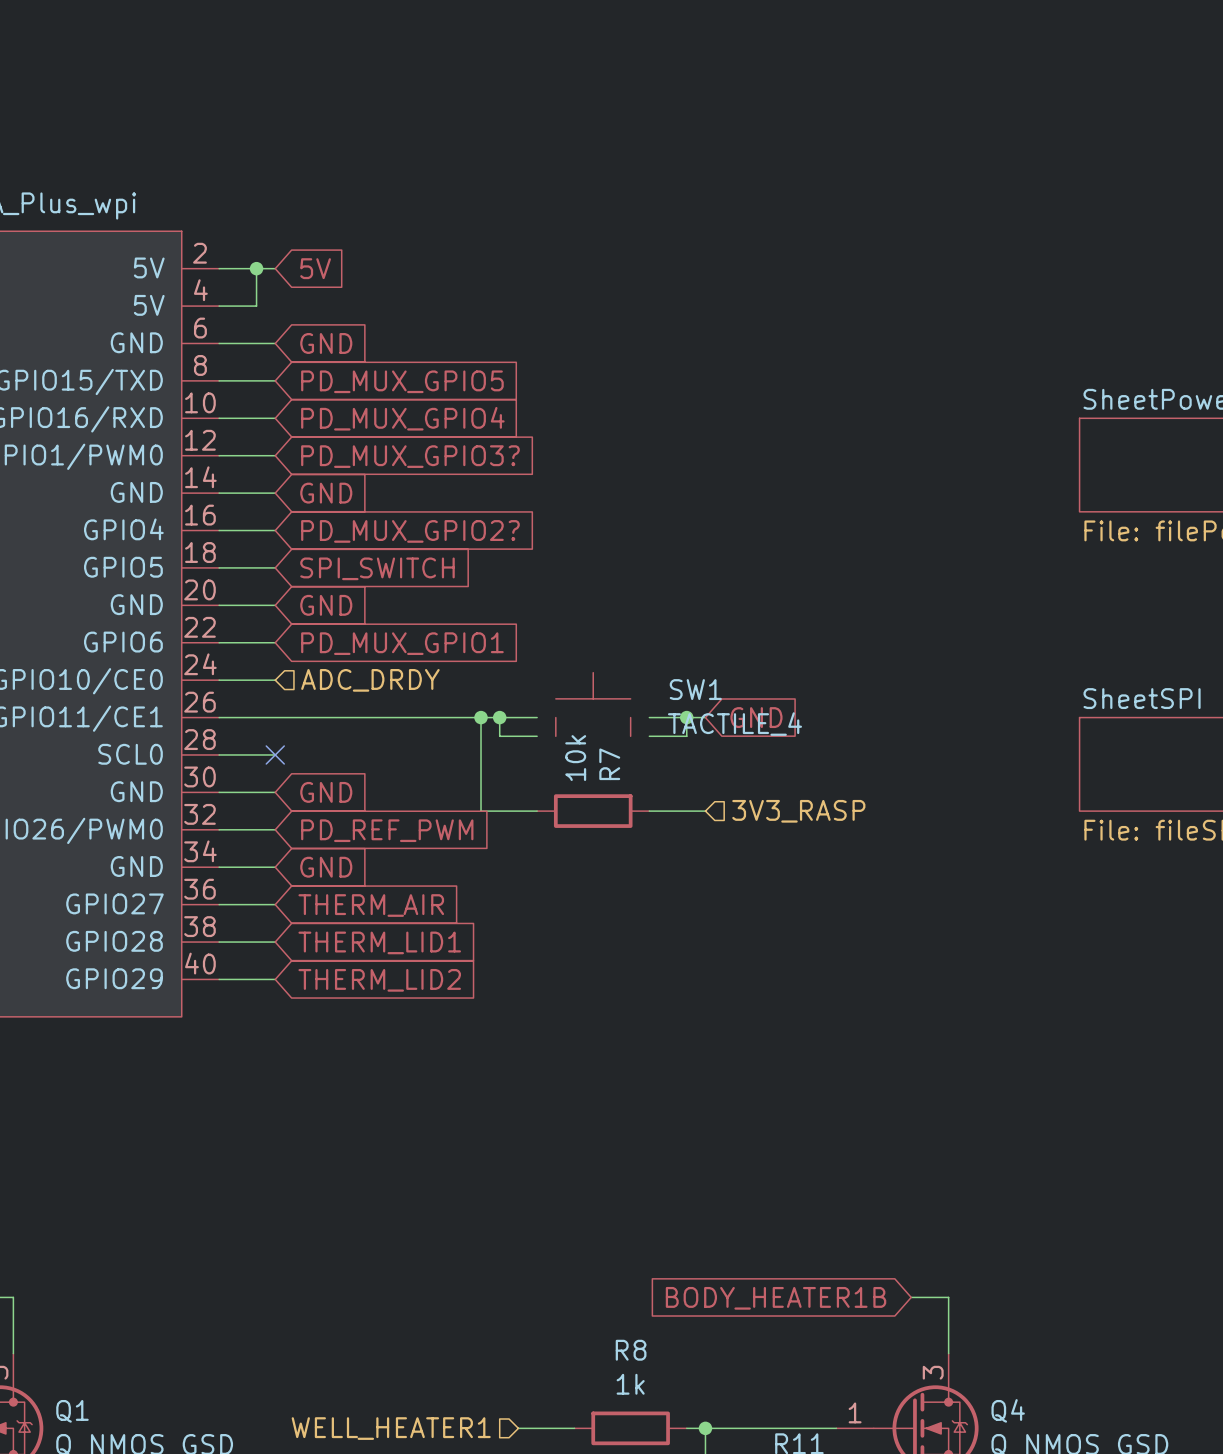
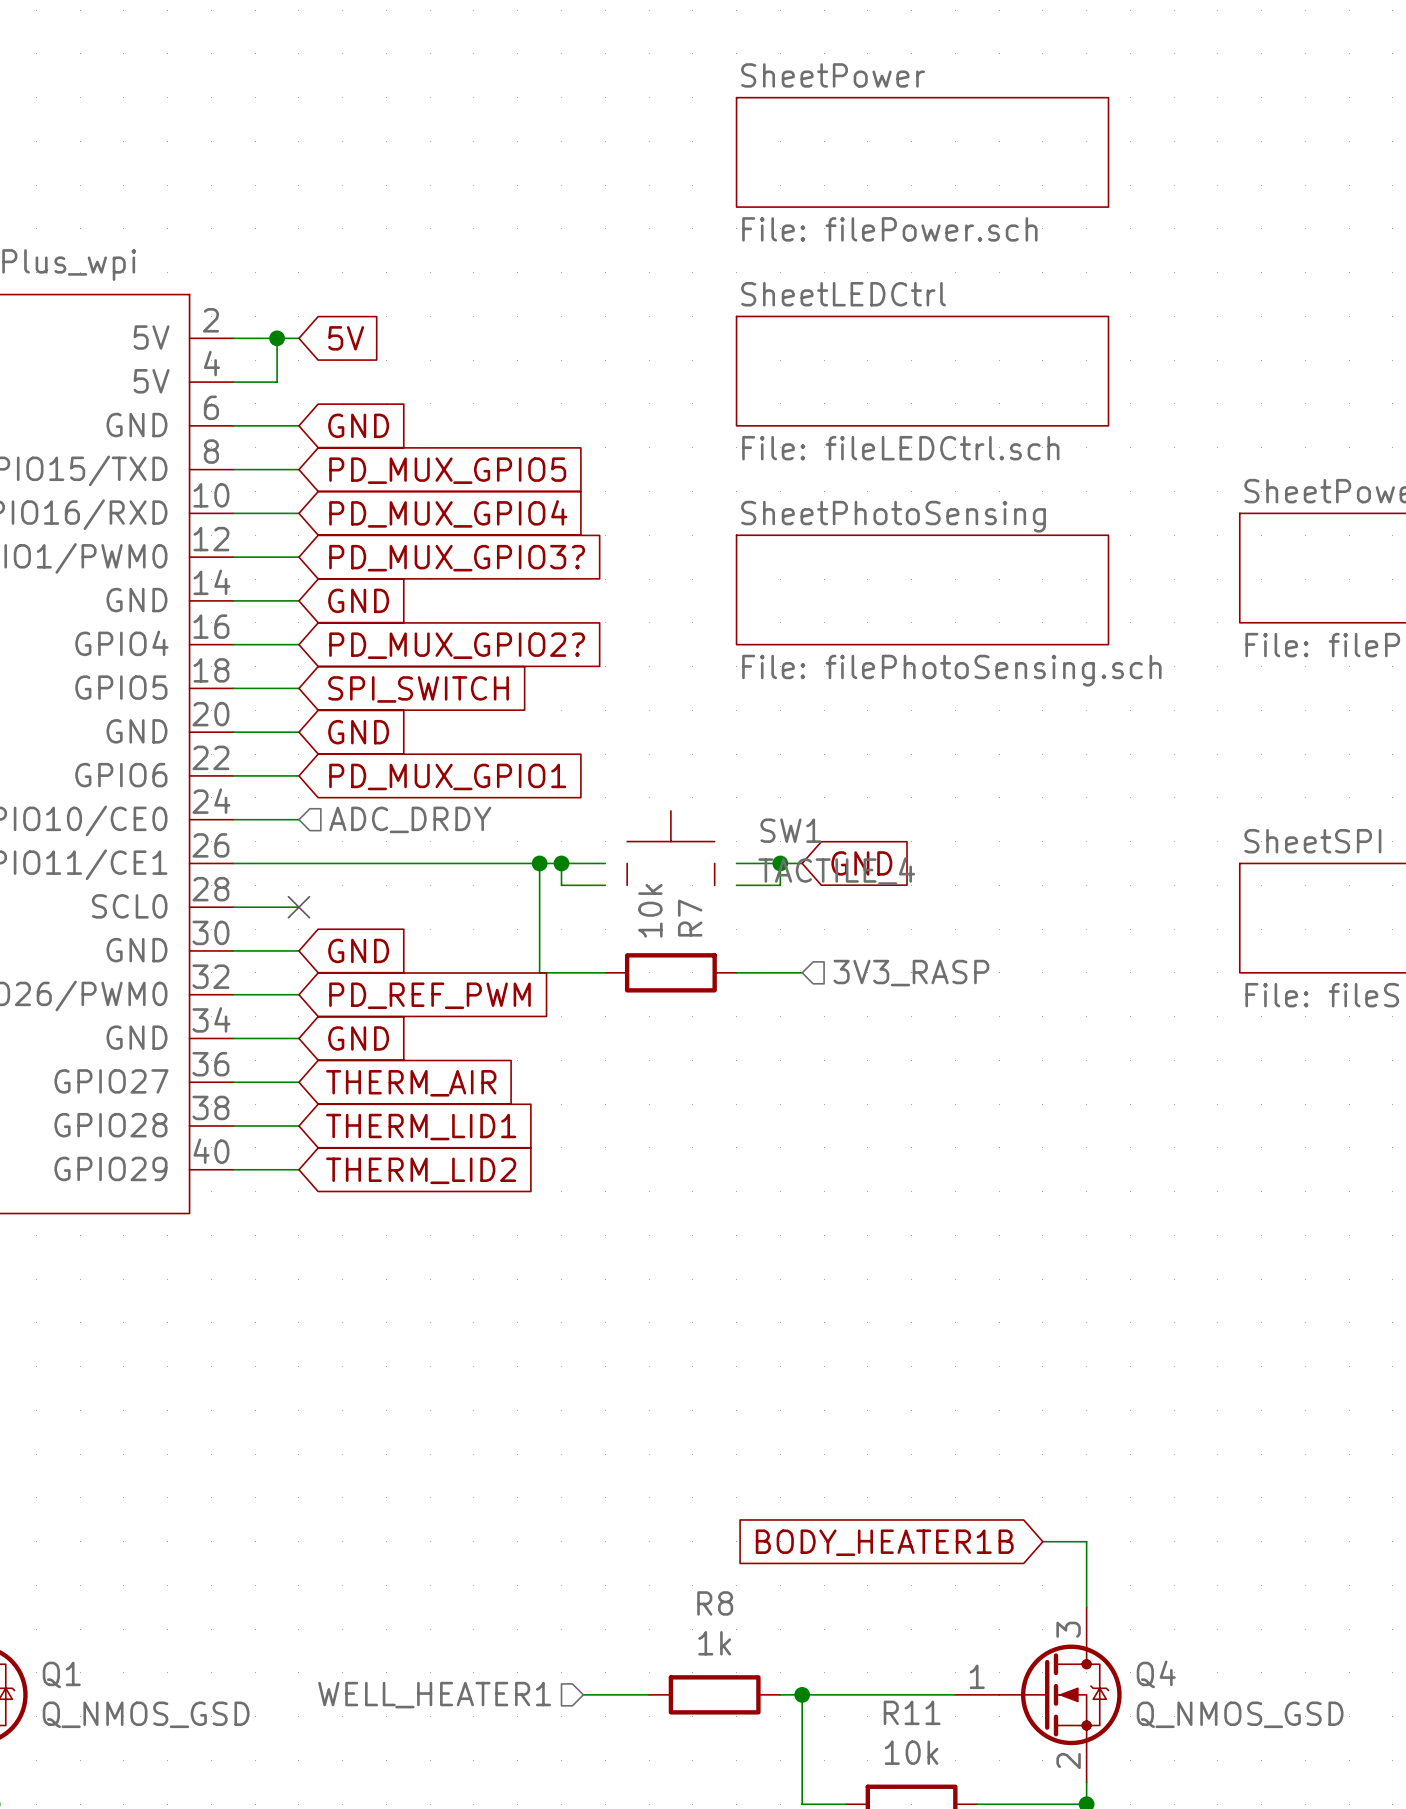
sheet SheetPower: none -> File: filePower.sch (922, 152)
sheet SheetLEDCtrl: none -> File: fileLEDCtrl.sch (922, 371)
sheet SheetPhotoSensing: none -> File: filePhotoSensing.sch (922, 589)

